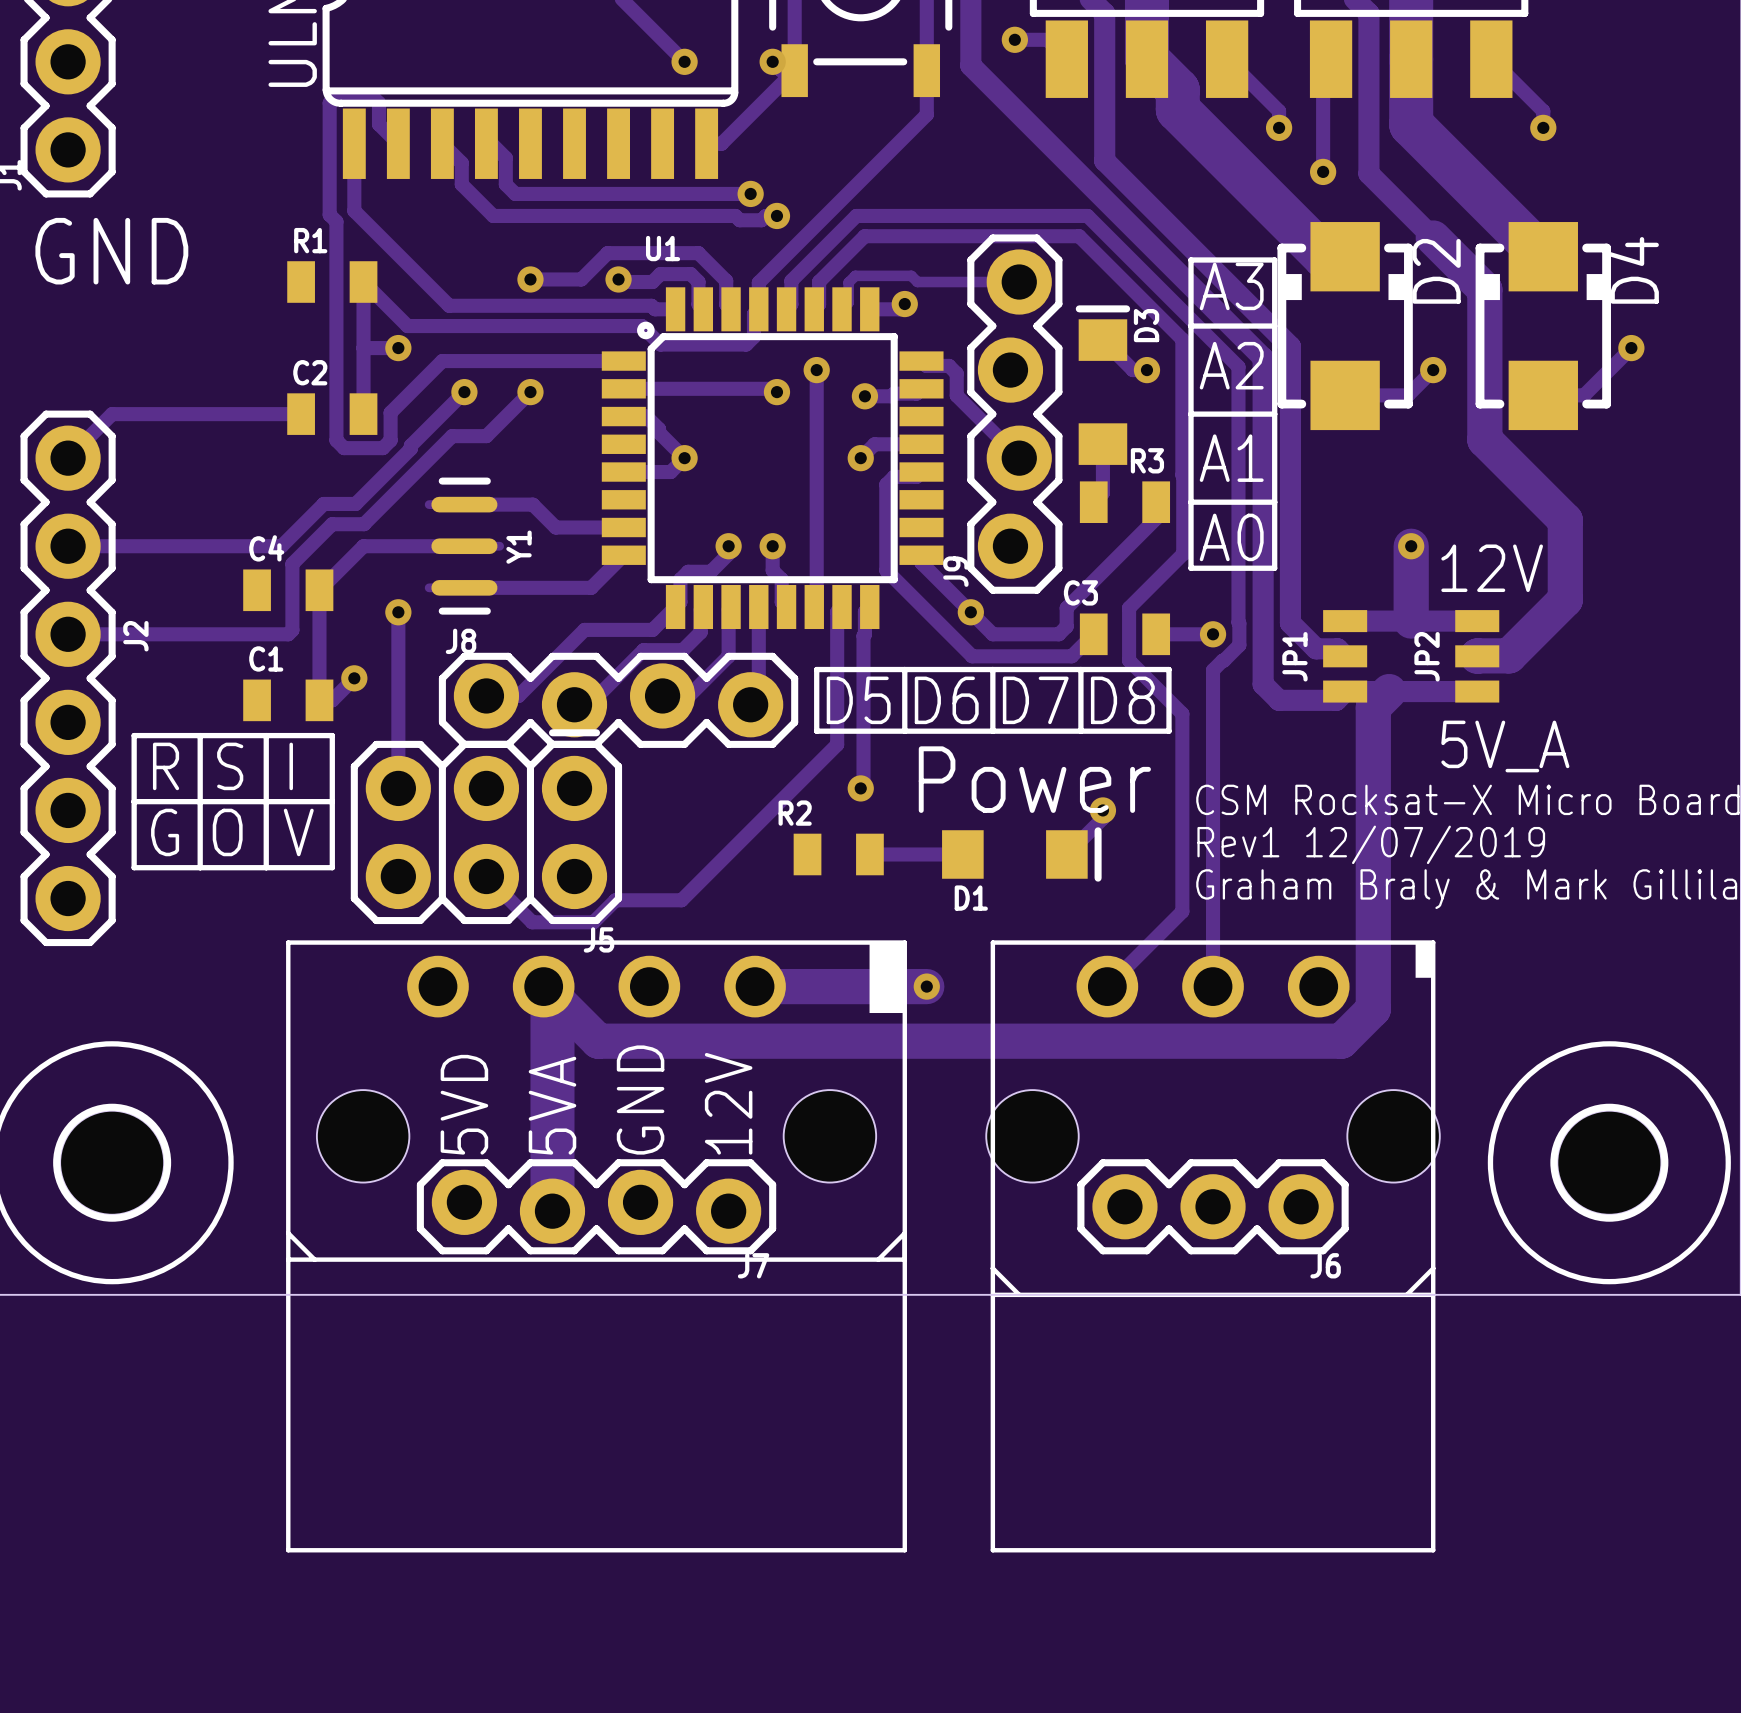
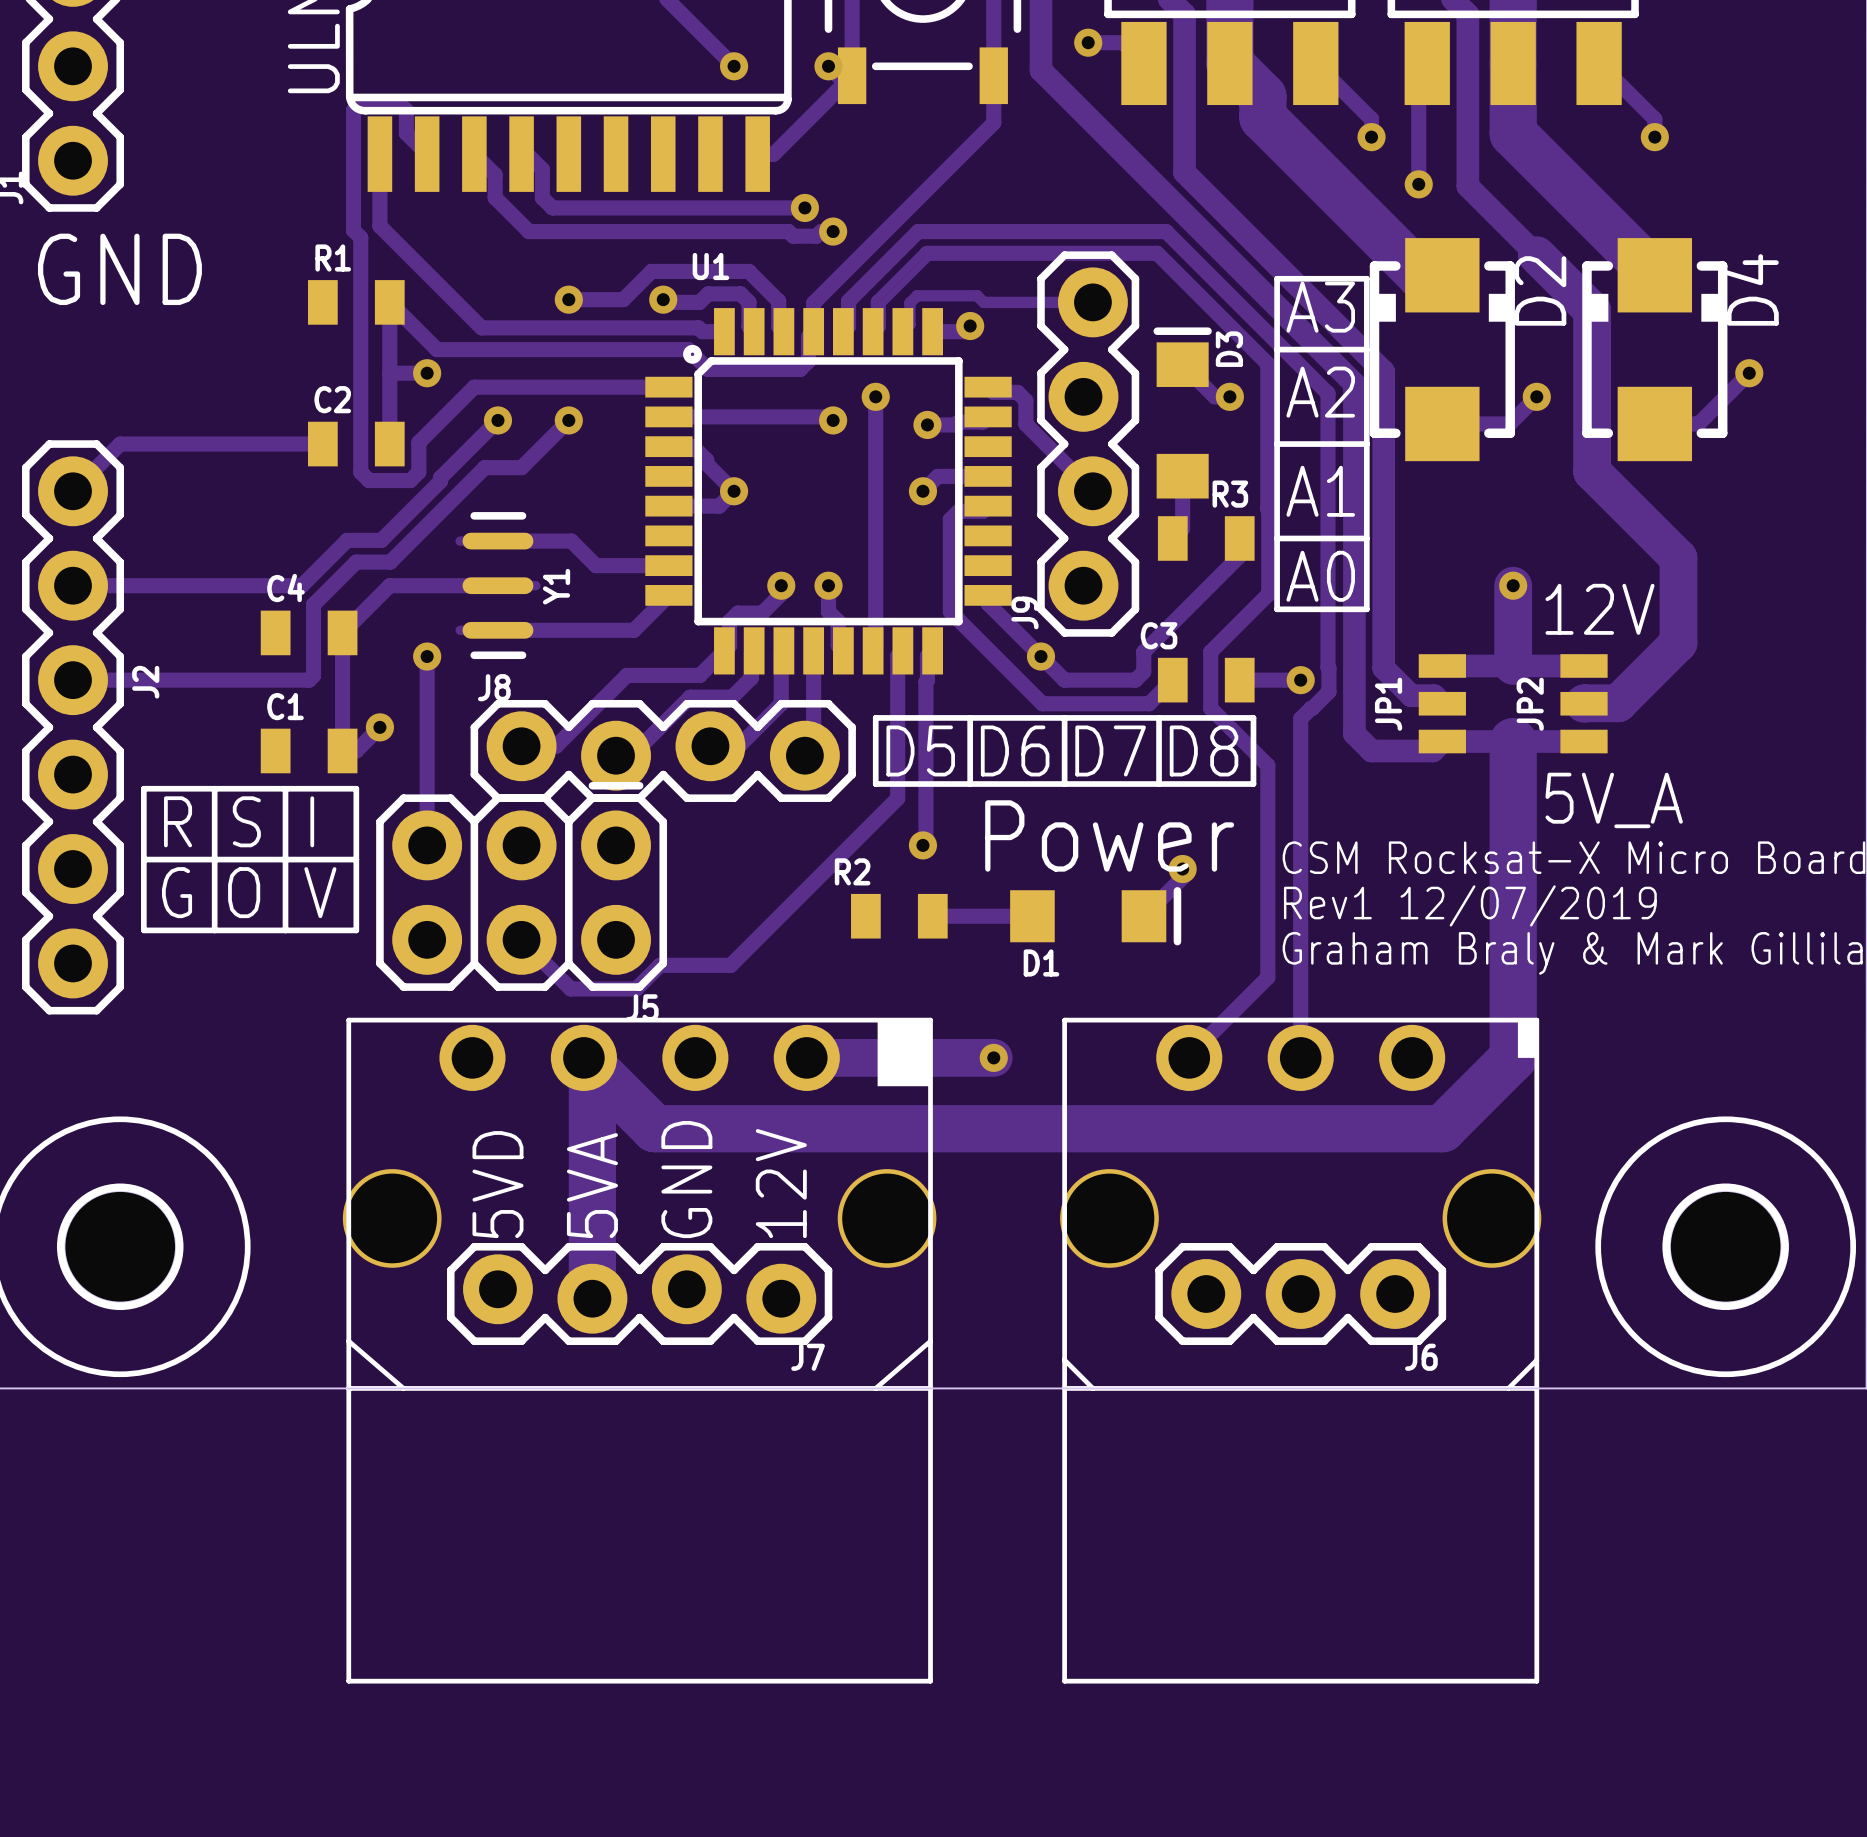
track: (1389, 691) (1373, 707) (1373, 1009) (1341, 1041) (598, 1041) (543, 986) (552, 995) -> (1513, 741) (1513, 1057) (1442, 1128) (654, 1128) (583, 1057) (592, 1067)
part footprint: [286, 940, 907, 1553] -> [342, 1017, 937, 1684]
part footprint: [986, 940, 1440, 1553] -> [1060, 1017, 1542, 1684]

